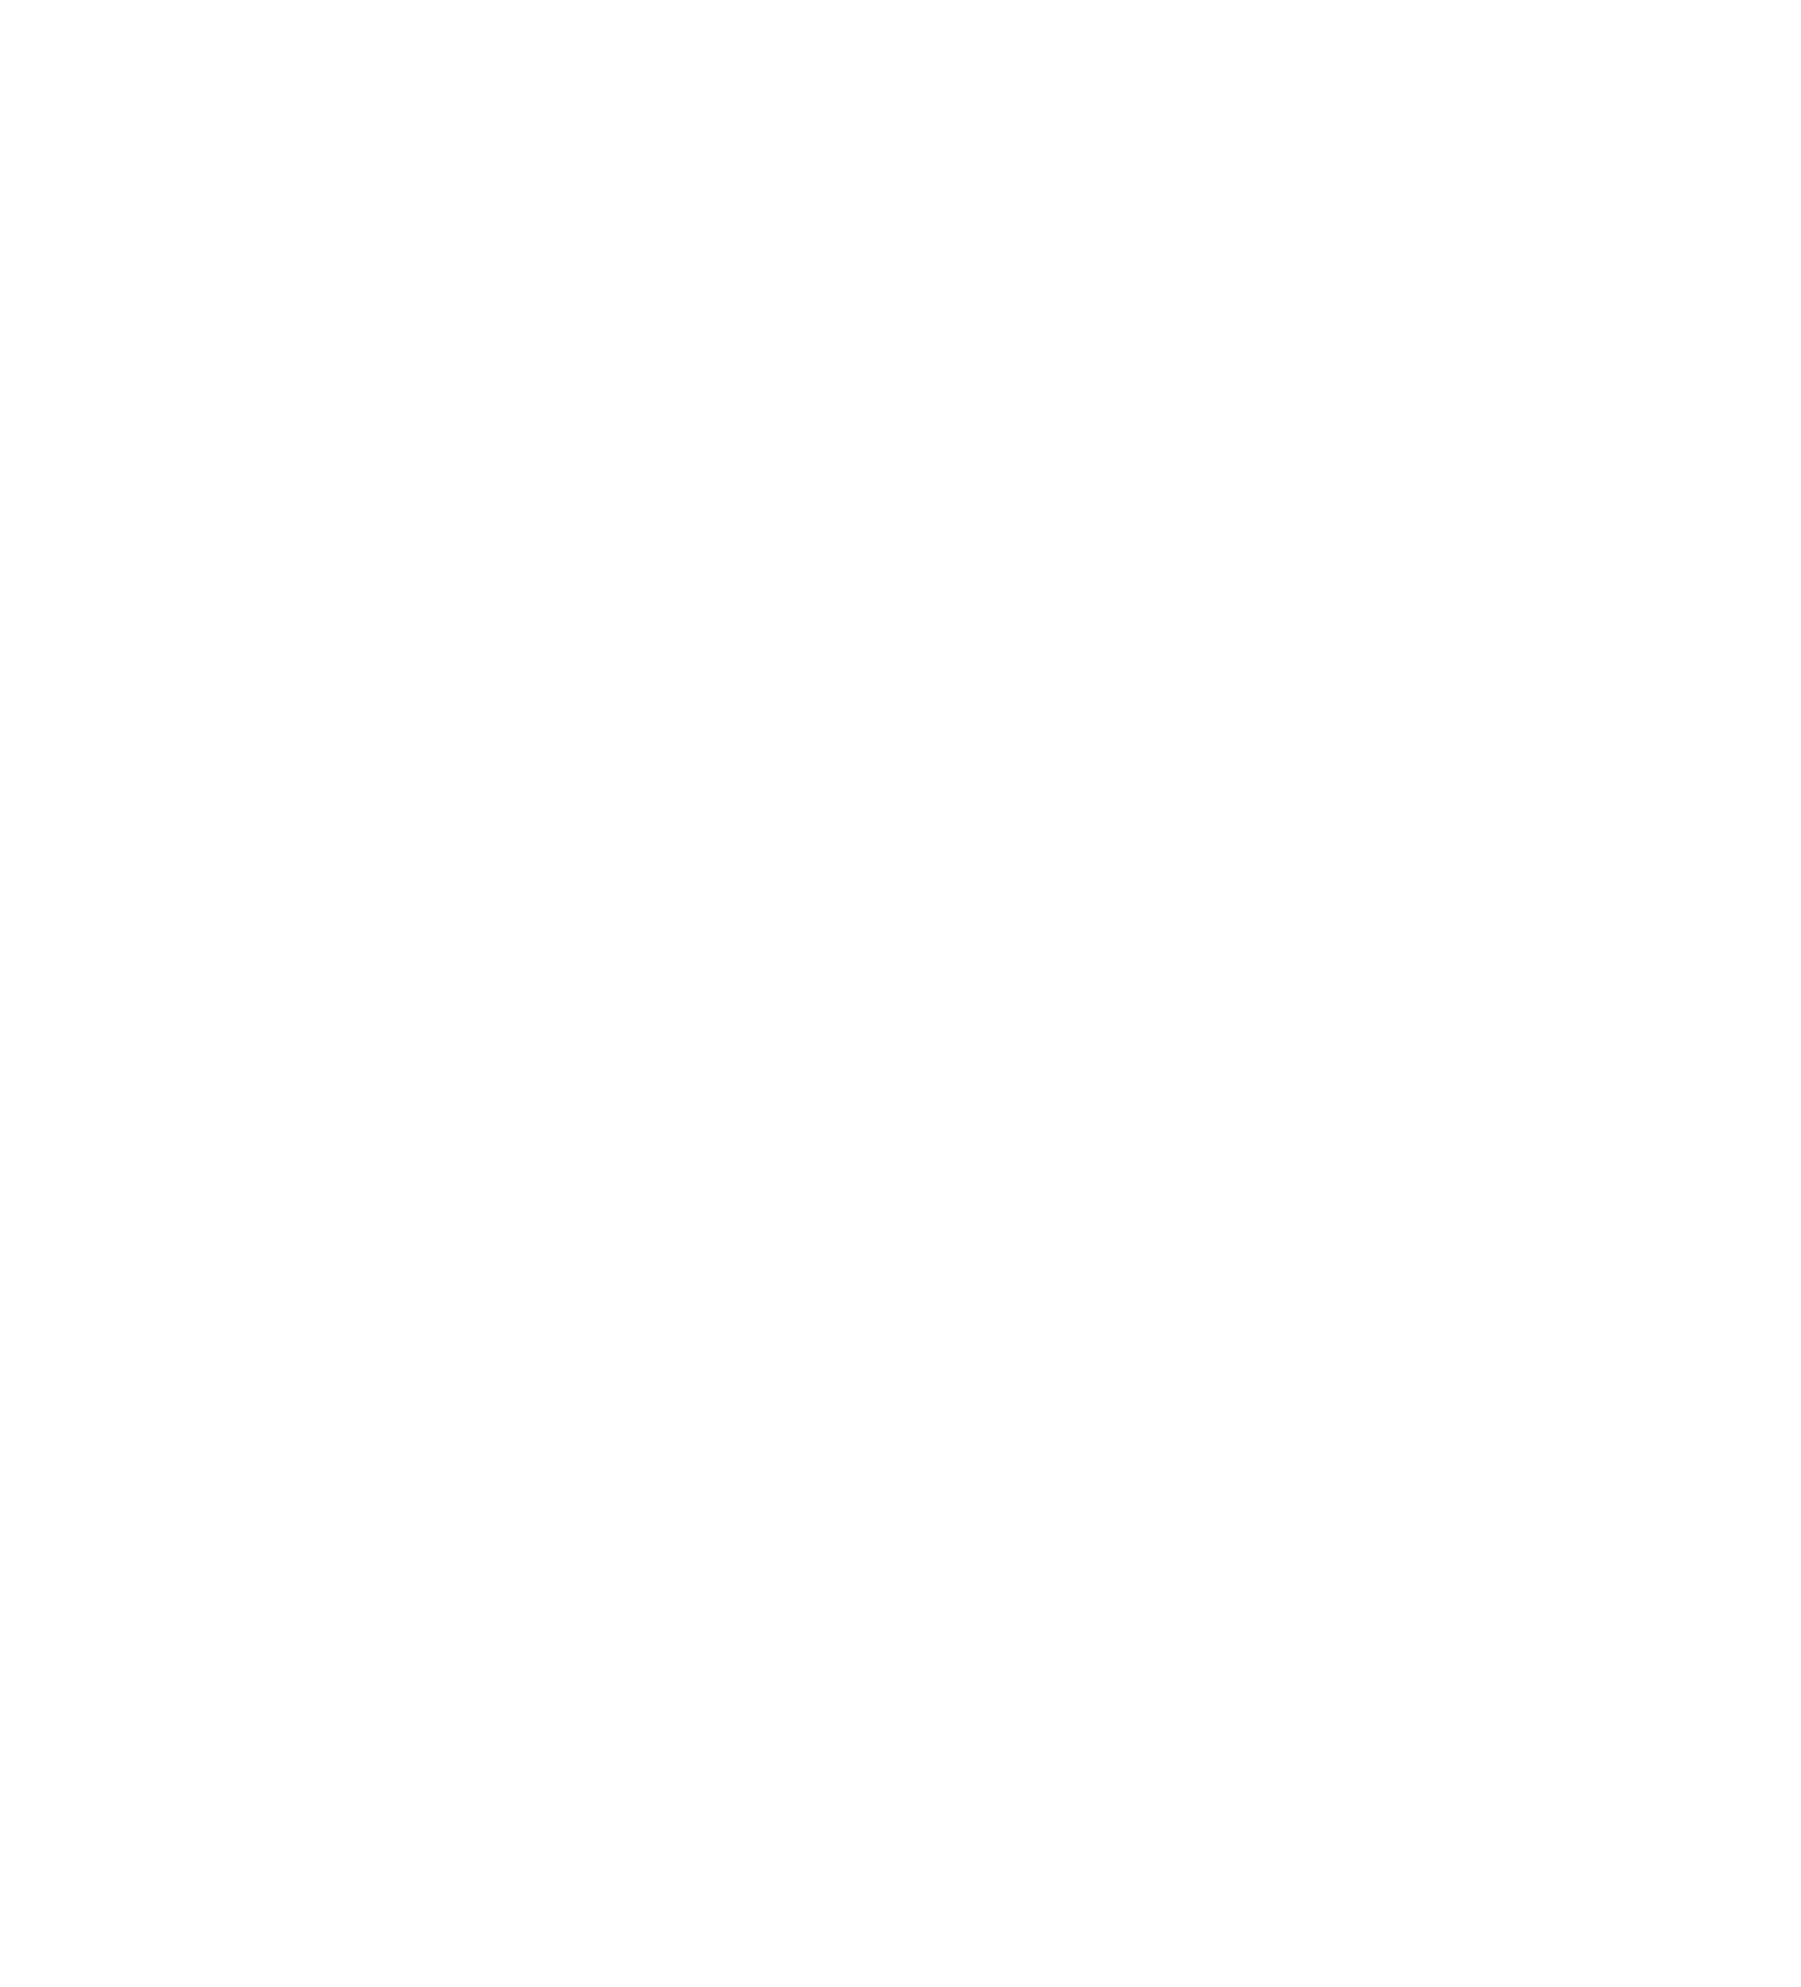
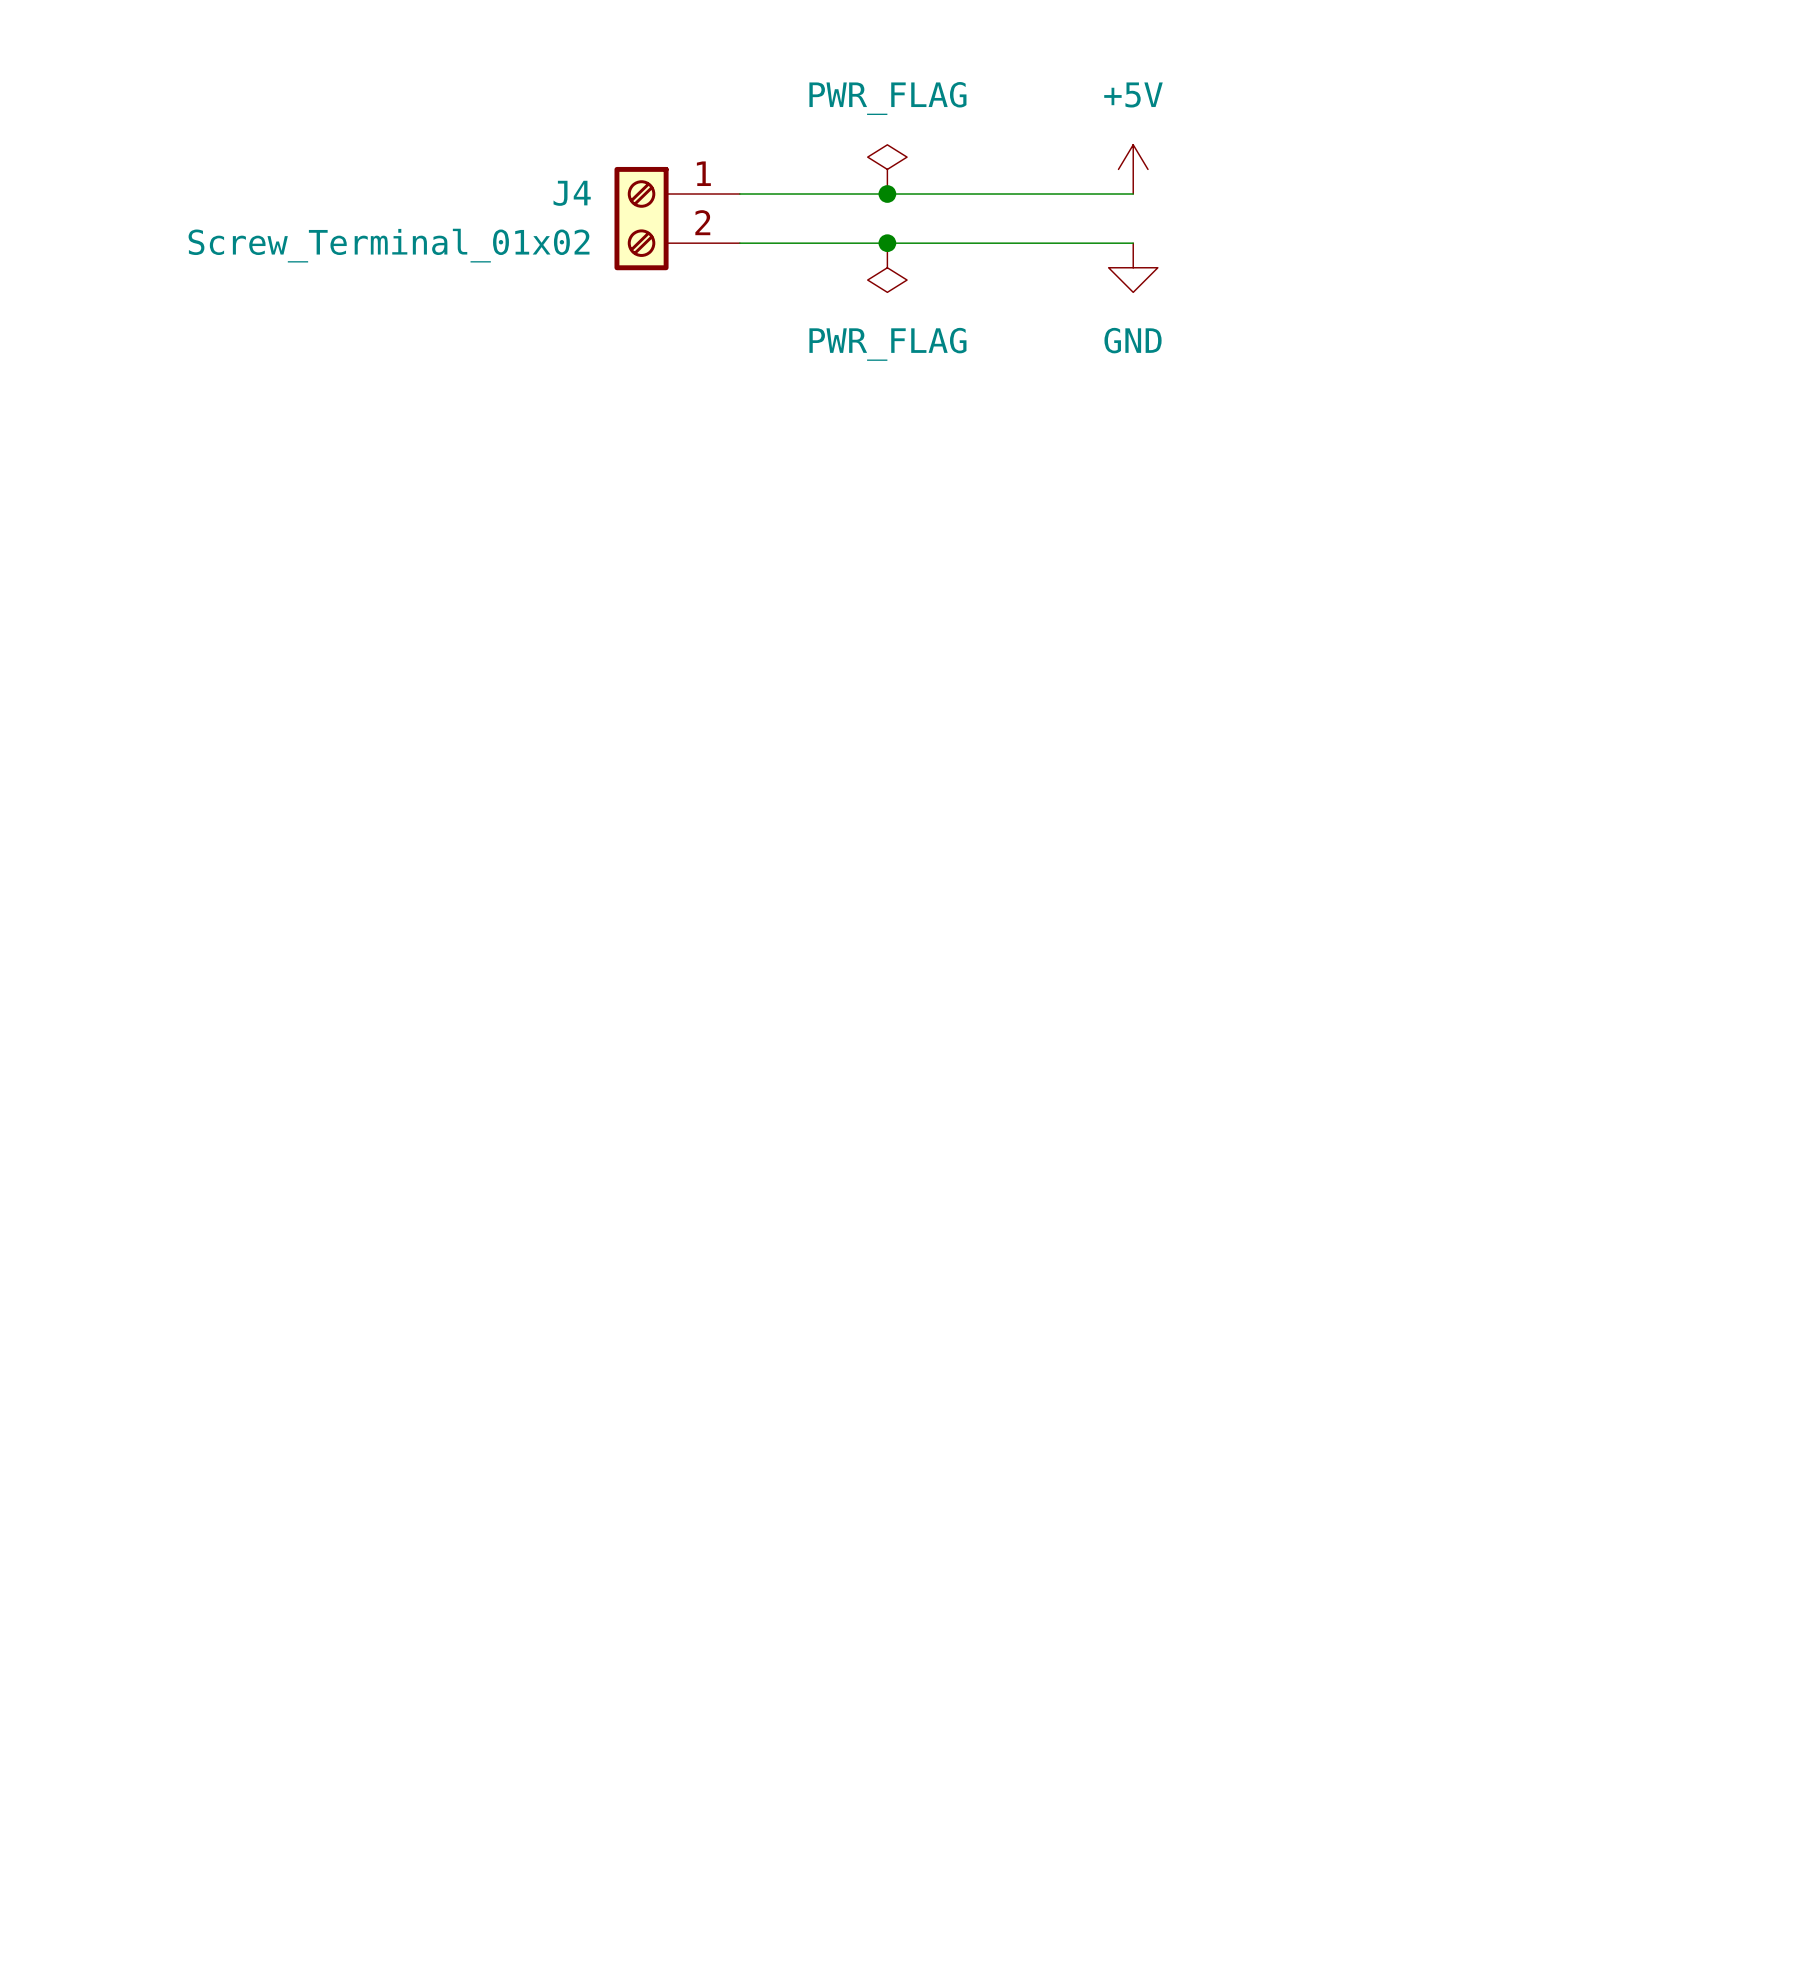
power symbol: none -> PWR_FLAG (887, 169)
power symbol: none -> +5V (1133, 169)
wire: none -> (739, 194) (1133, 194)
junction: none -> (887, 194)
J4: none -> Screw_Terminal_01x02 (677, 218)
wire: none -> (739, 243) (1133, 243)
junction: none -> (887, 243)
power symbol: none -> PWR_FLAG (887, 267)
power symbol: none -> GND (1133, 267)

